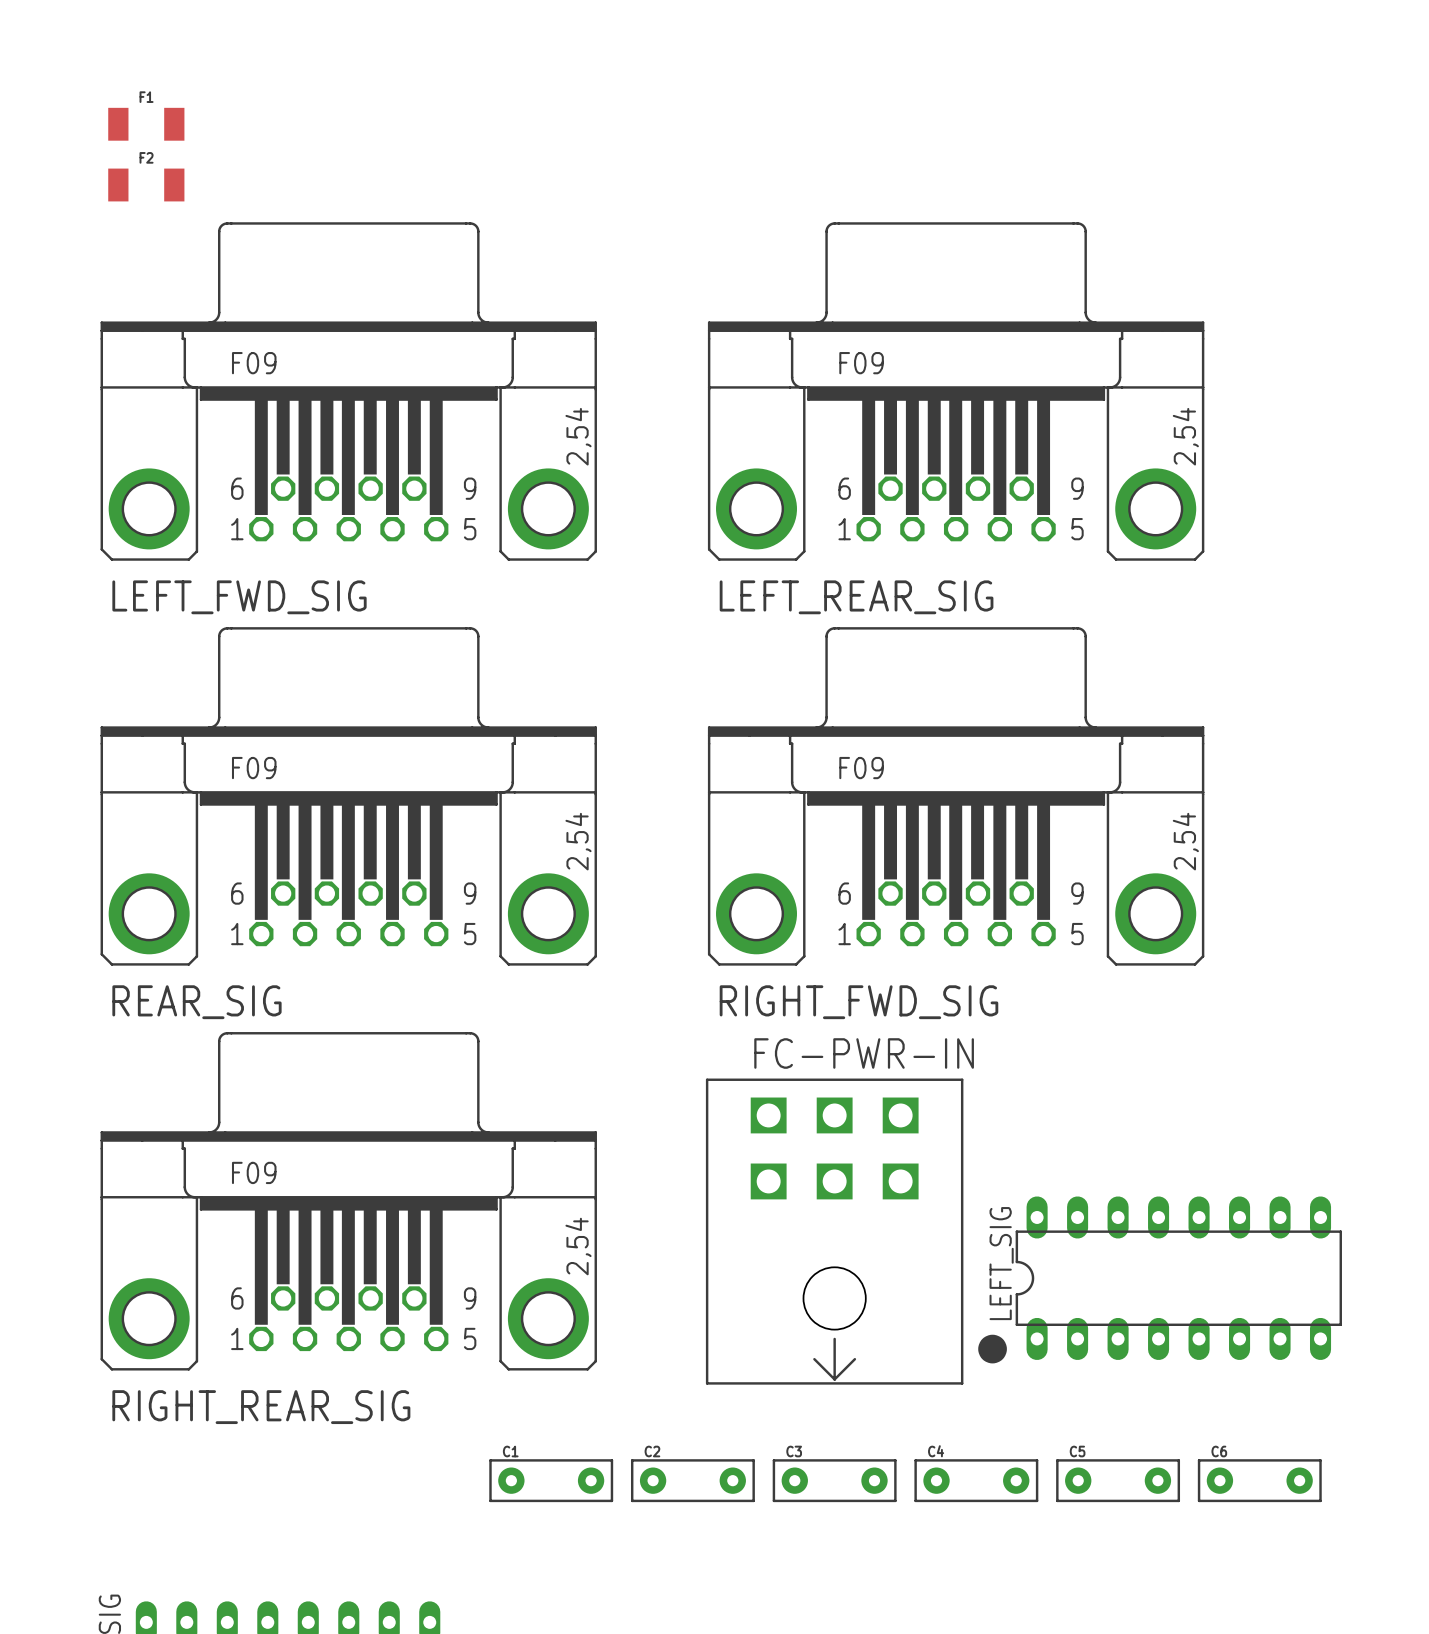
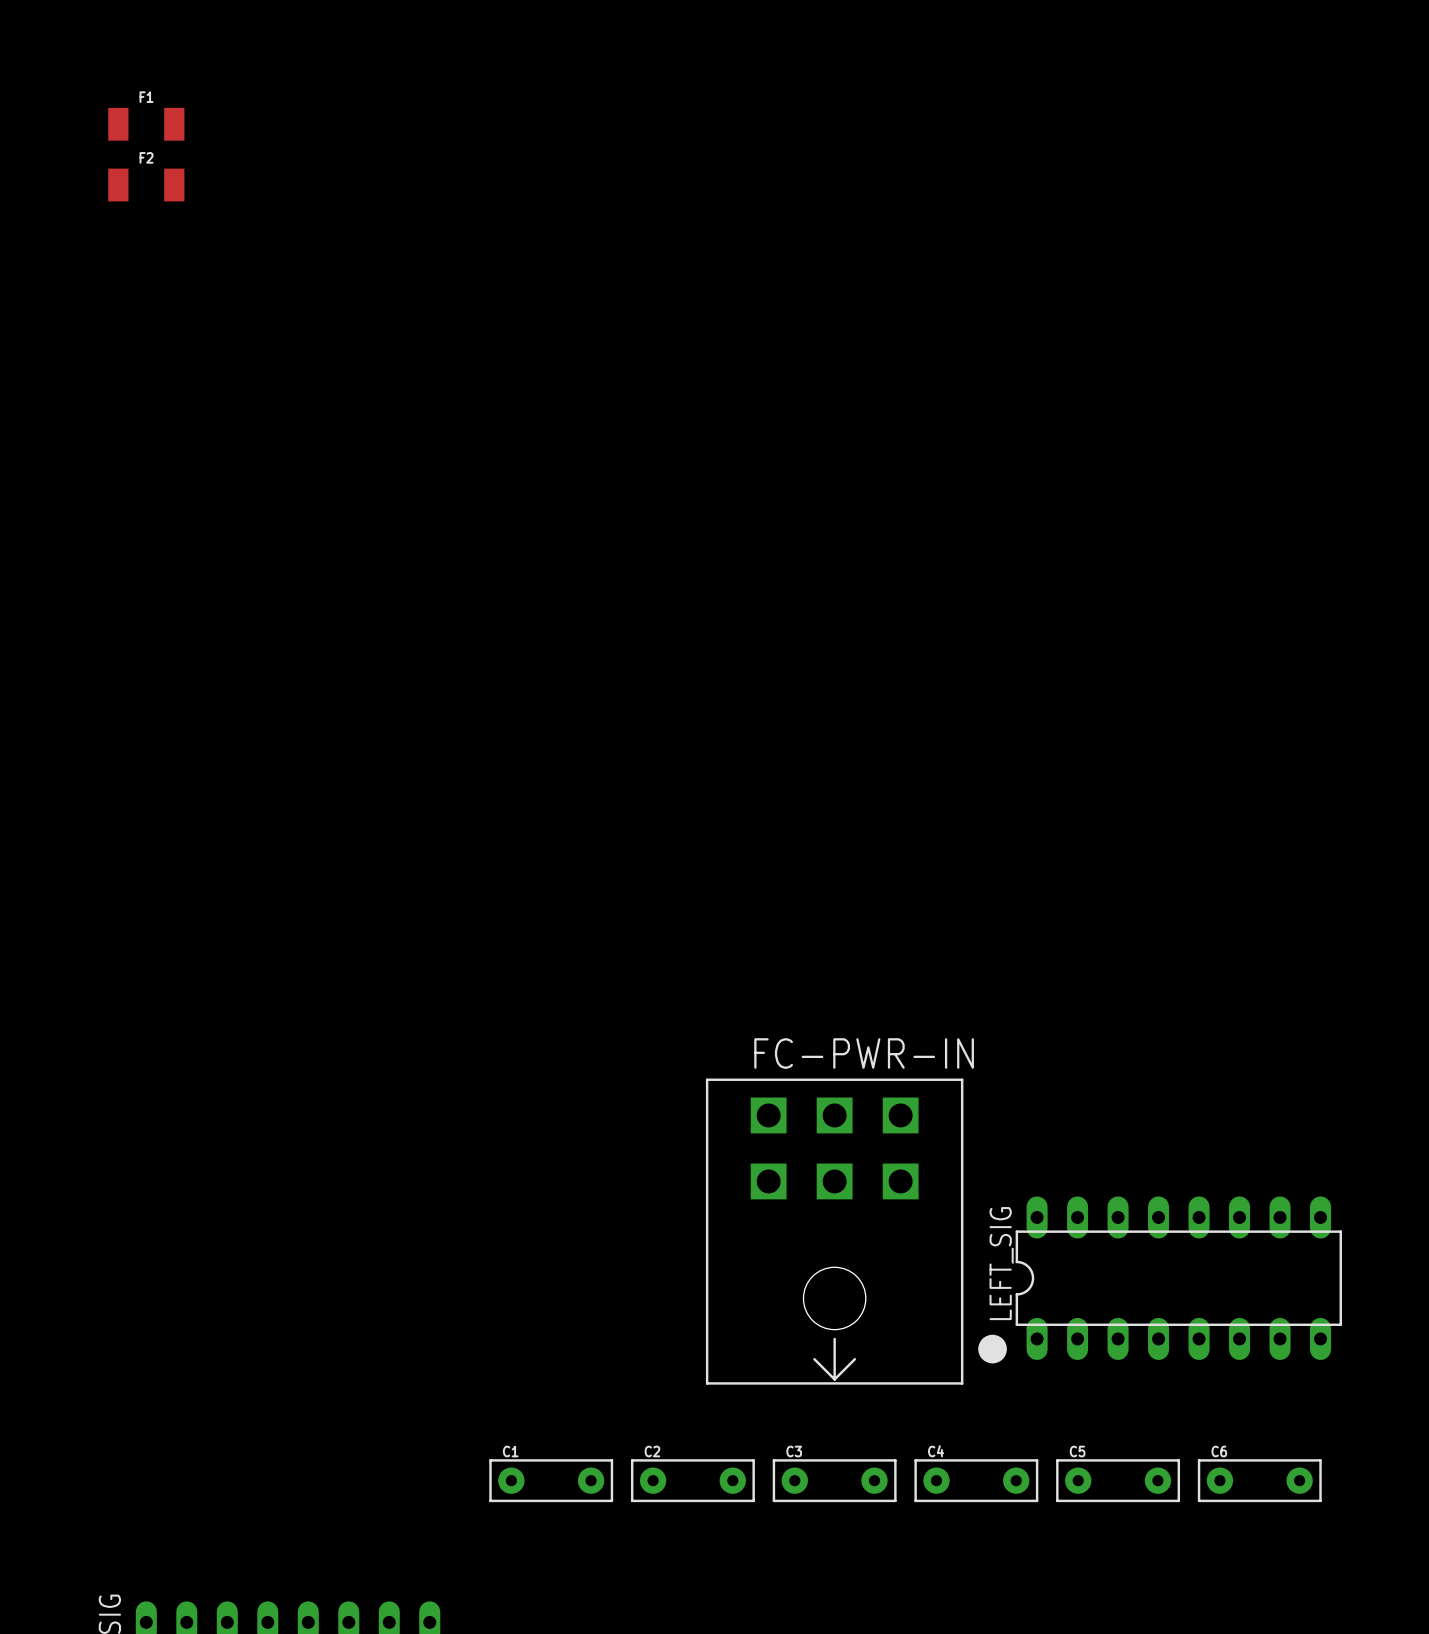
LEFT_FWD_SIG: (348, 391) -> none
LEFT_REAR_SIG: (956, 391) -> none
REAR_SIG: (348, 796) -> none
RIGHT_FWD_SIG: (956, 796) -> none
RIGHT_REAR_SIG: (348, 1201) -> none

